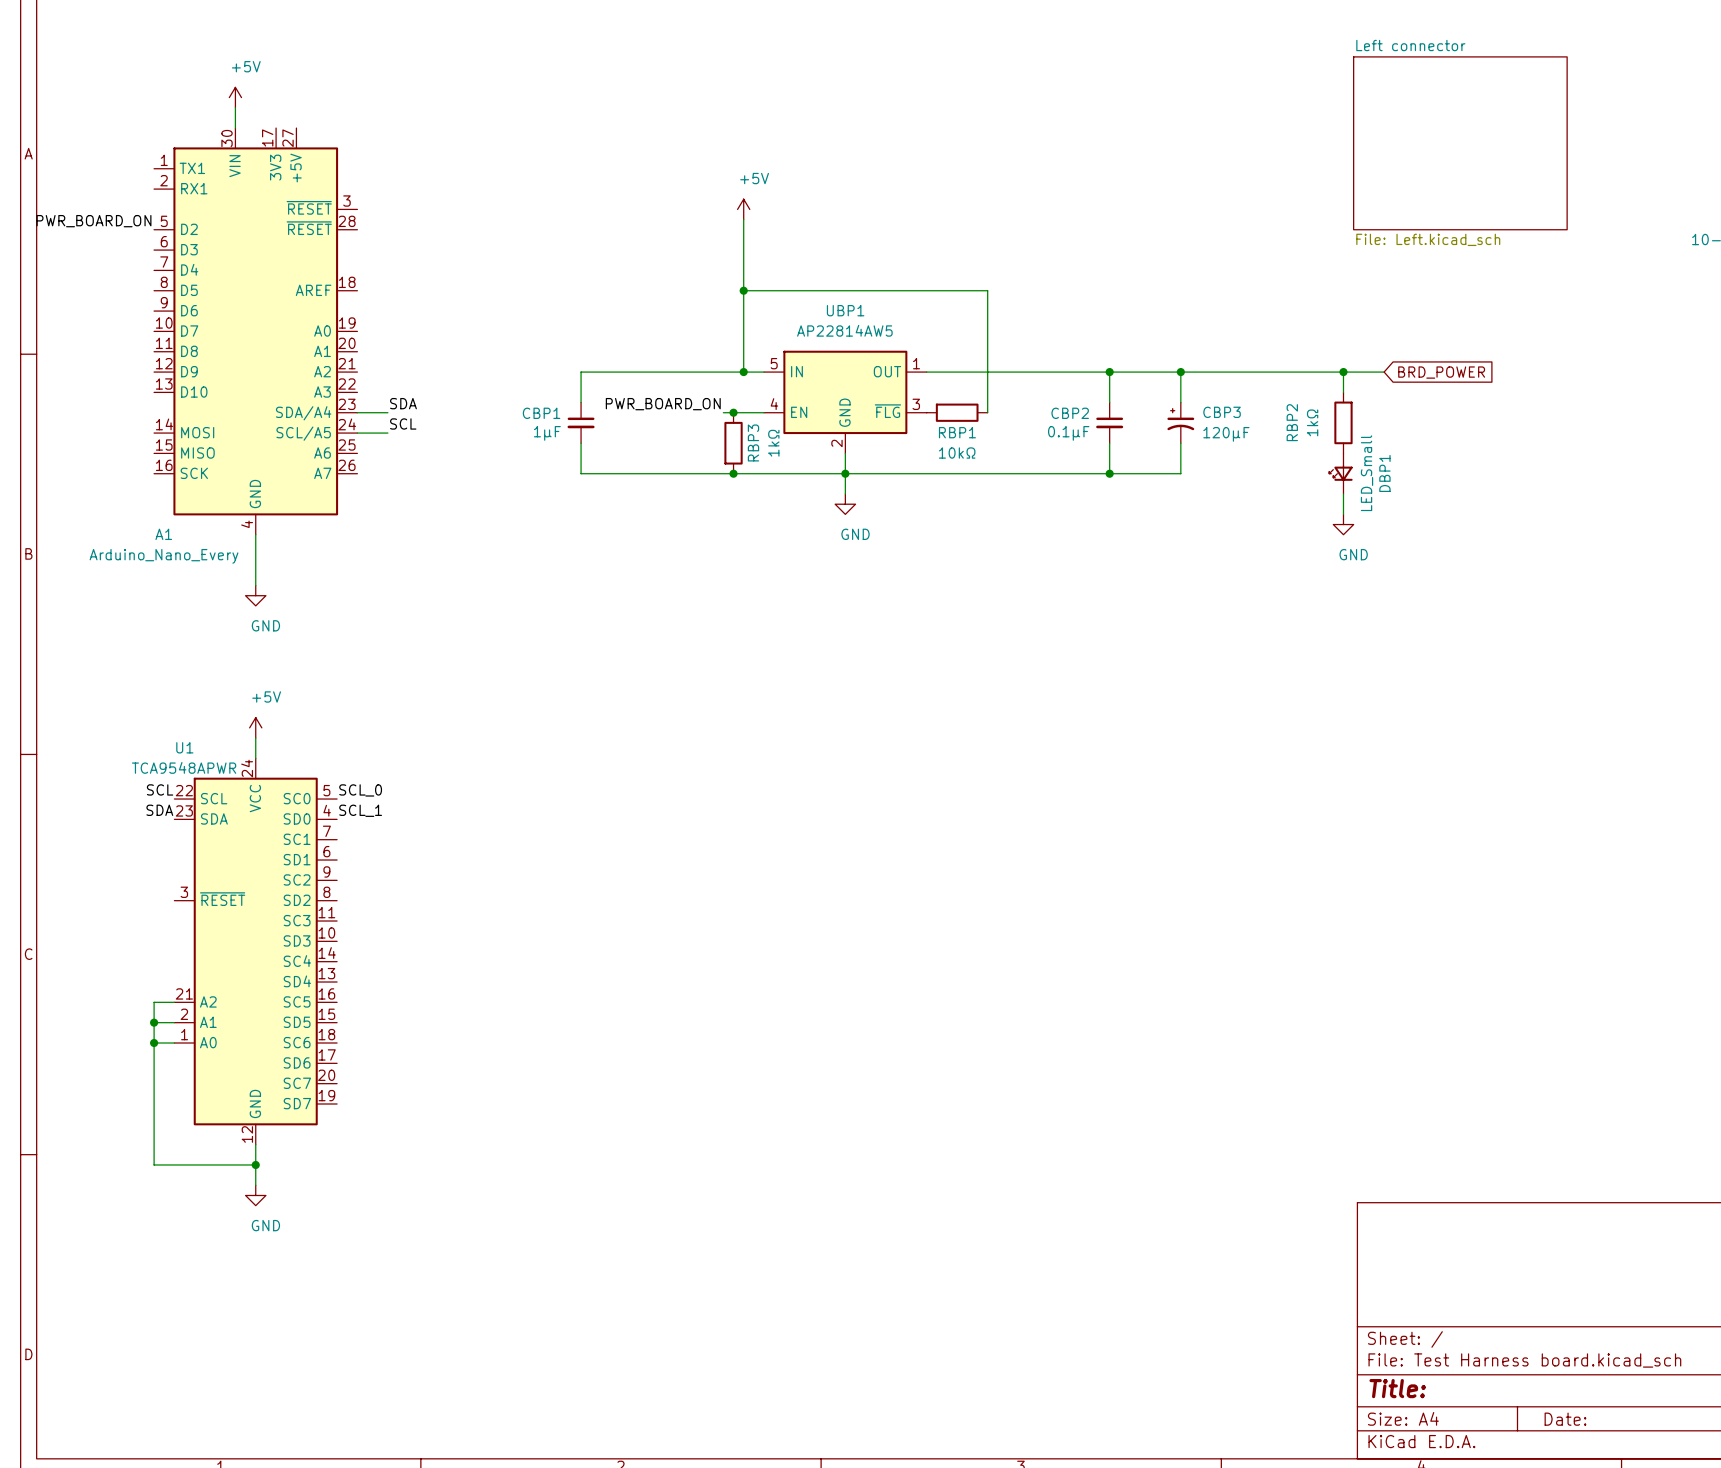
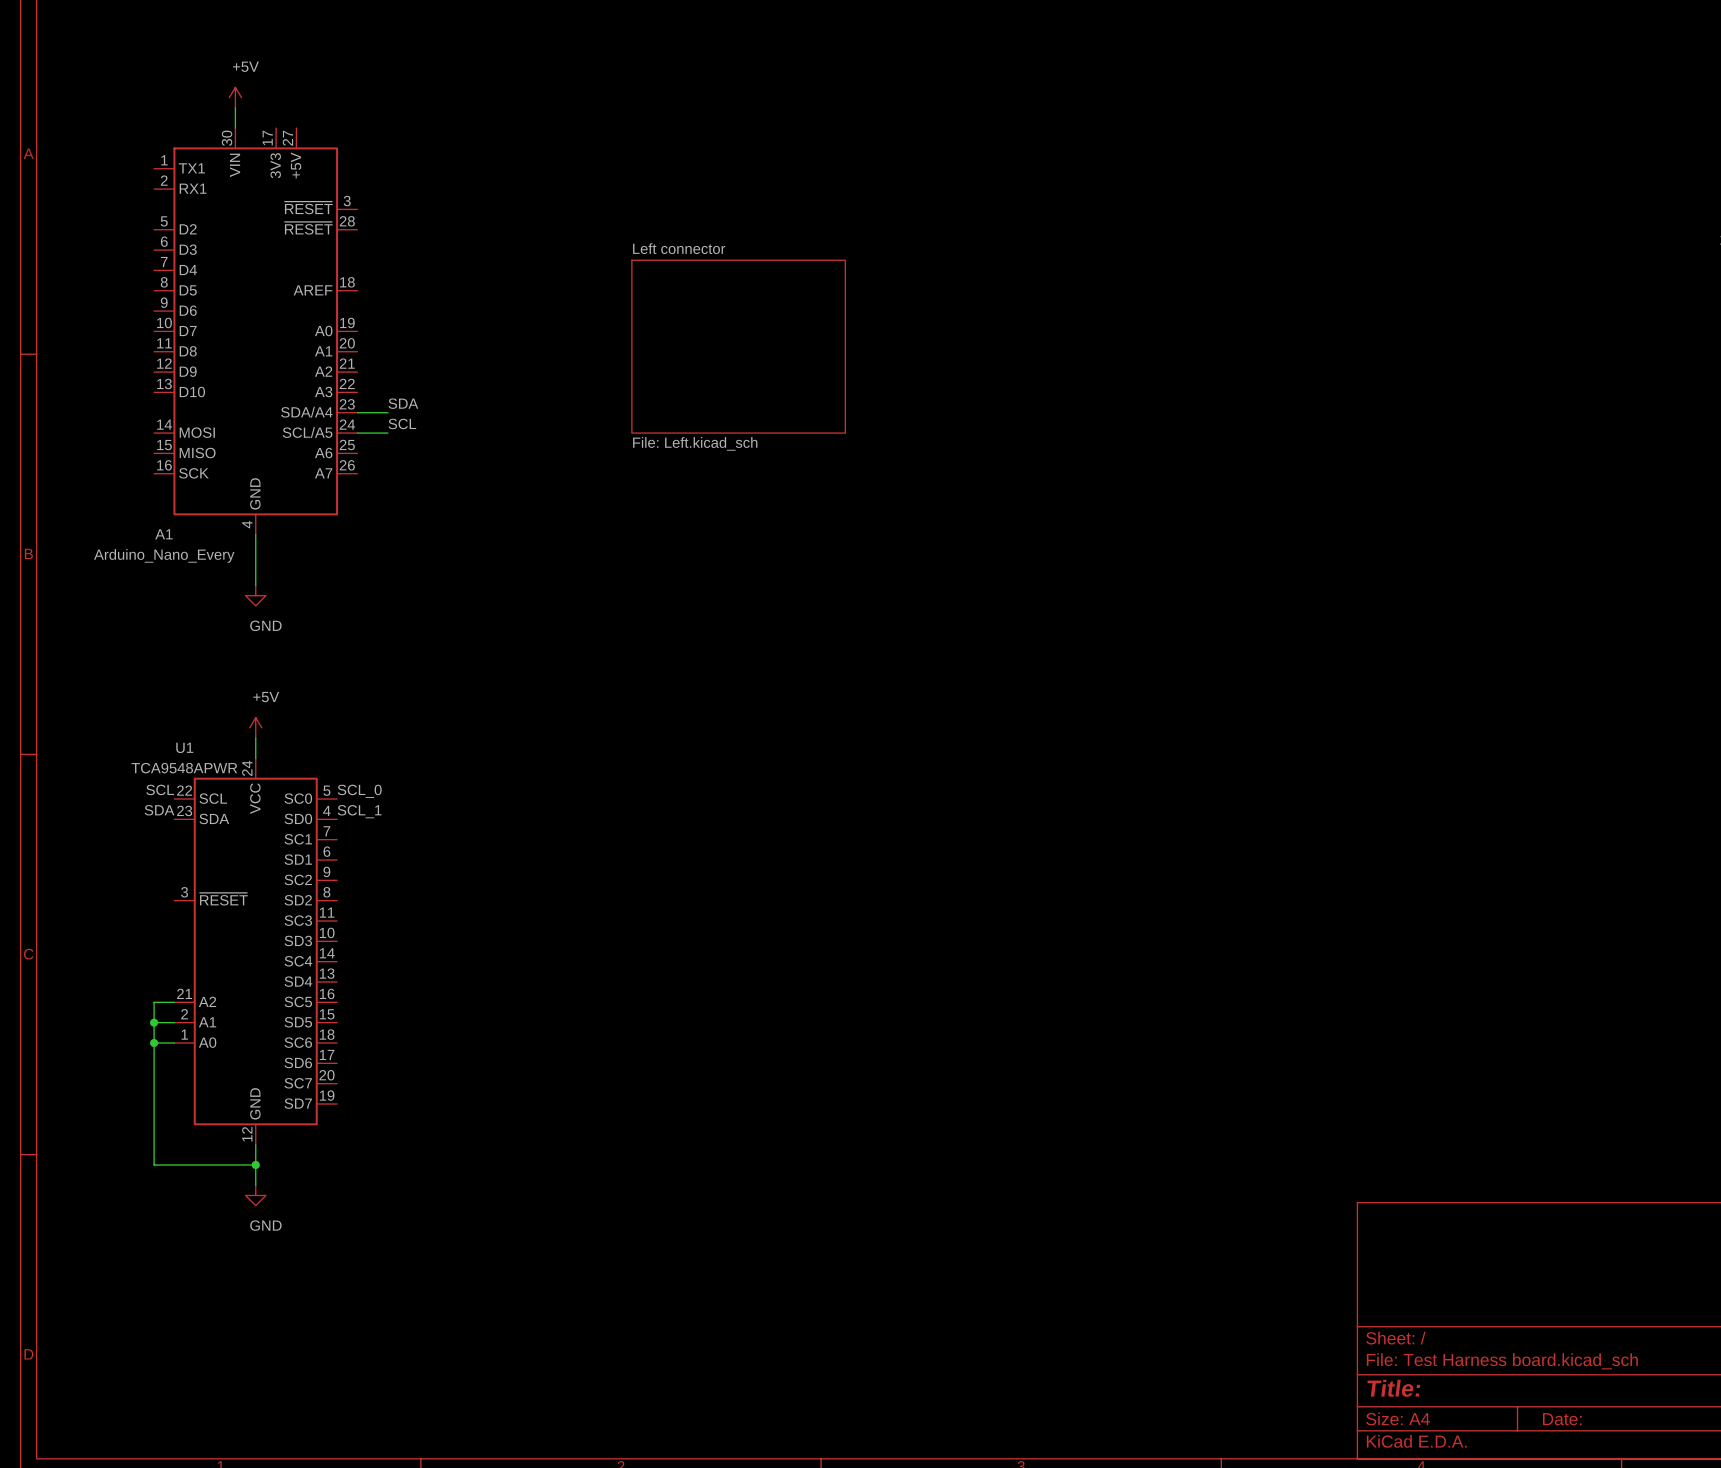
sheet Left connector: File: Left.kicad_sch (1460, 143) -> none
power symbol: +5V (743, 209) -> none
wire: (743, 219) (743, 372) -> none
label: PWR_BOARD_ON (93, 221) -> none
wire: (743, 290) (987, 290) (987, 412) -> none
junction: (743, 290) -> none
sheet Left connector: none -> File: Left.kicad_sch (738, 346)
junction: (743, 372) -> none
wire: (764, 372) (581, 372) (581, 402) -> none
wire: (926, 372) (1384, 372) -> none
wire: (1109, 372) (1109, 402) -> none
junction: (1109, 372) -> none
wire: (1180, 372) (1180, 402) -> none
junction: (1180, 372) -> none
wire: (1343, 372) (1343, 392) -> none
junction: (1343, 372) -> none
global label: BRD_POWER (1441, 372) -> none
UBP1: AP22814AW5 (845, 402) -> none
label: PWR_BOARD_ON (663, 404) -> none
wire: (723, 412) (764, 412) -> none
junction: (733, 412) -> none
RBP1: 10kΩ (957, 412) -> none
CBP1: 1µF (581, 422) -> none
CBP2: 0.1µF (1109, 422) -> none
CBP3: 120µF (1180, 422) -> none
RBP2: 1kΩ (1343, 422) -> none
wire: (581, 443) (581, 473) (1180, 473) (1180, 443) -> none
RBP3: 1kΩ (733, 443) -> none
wire: (1109, 443) (1109, 473) -> none
wire: (845, 453) (845, 494) -> none
junction: (733, 473) -> none
junction: (845, 473) -> none
junction: (1109, 473) -> none
DBP1: LED_Small (1340, 473) -> none
wire: (1343, 494) (1343, 514) -> none
power symbol: GND (845, 504) -> none
power symbol: GND (1343, 524) -> none

